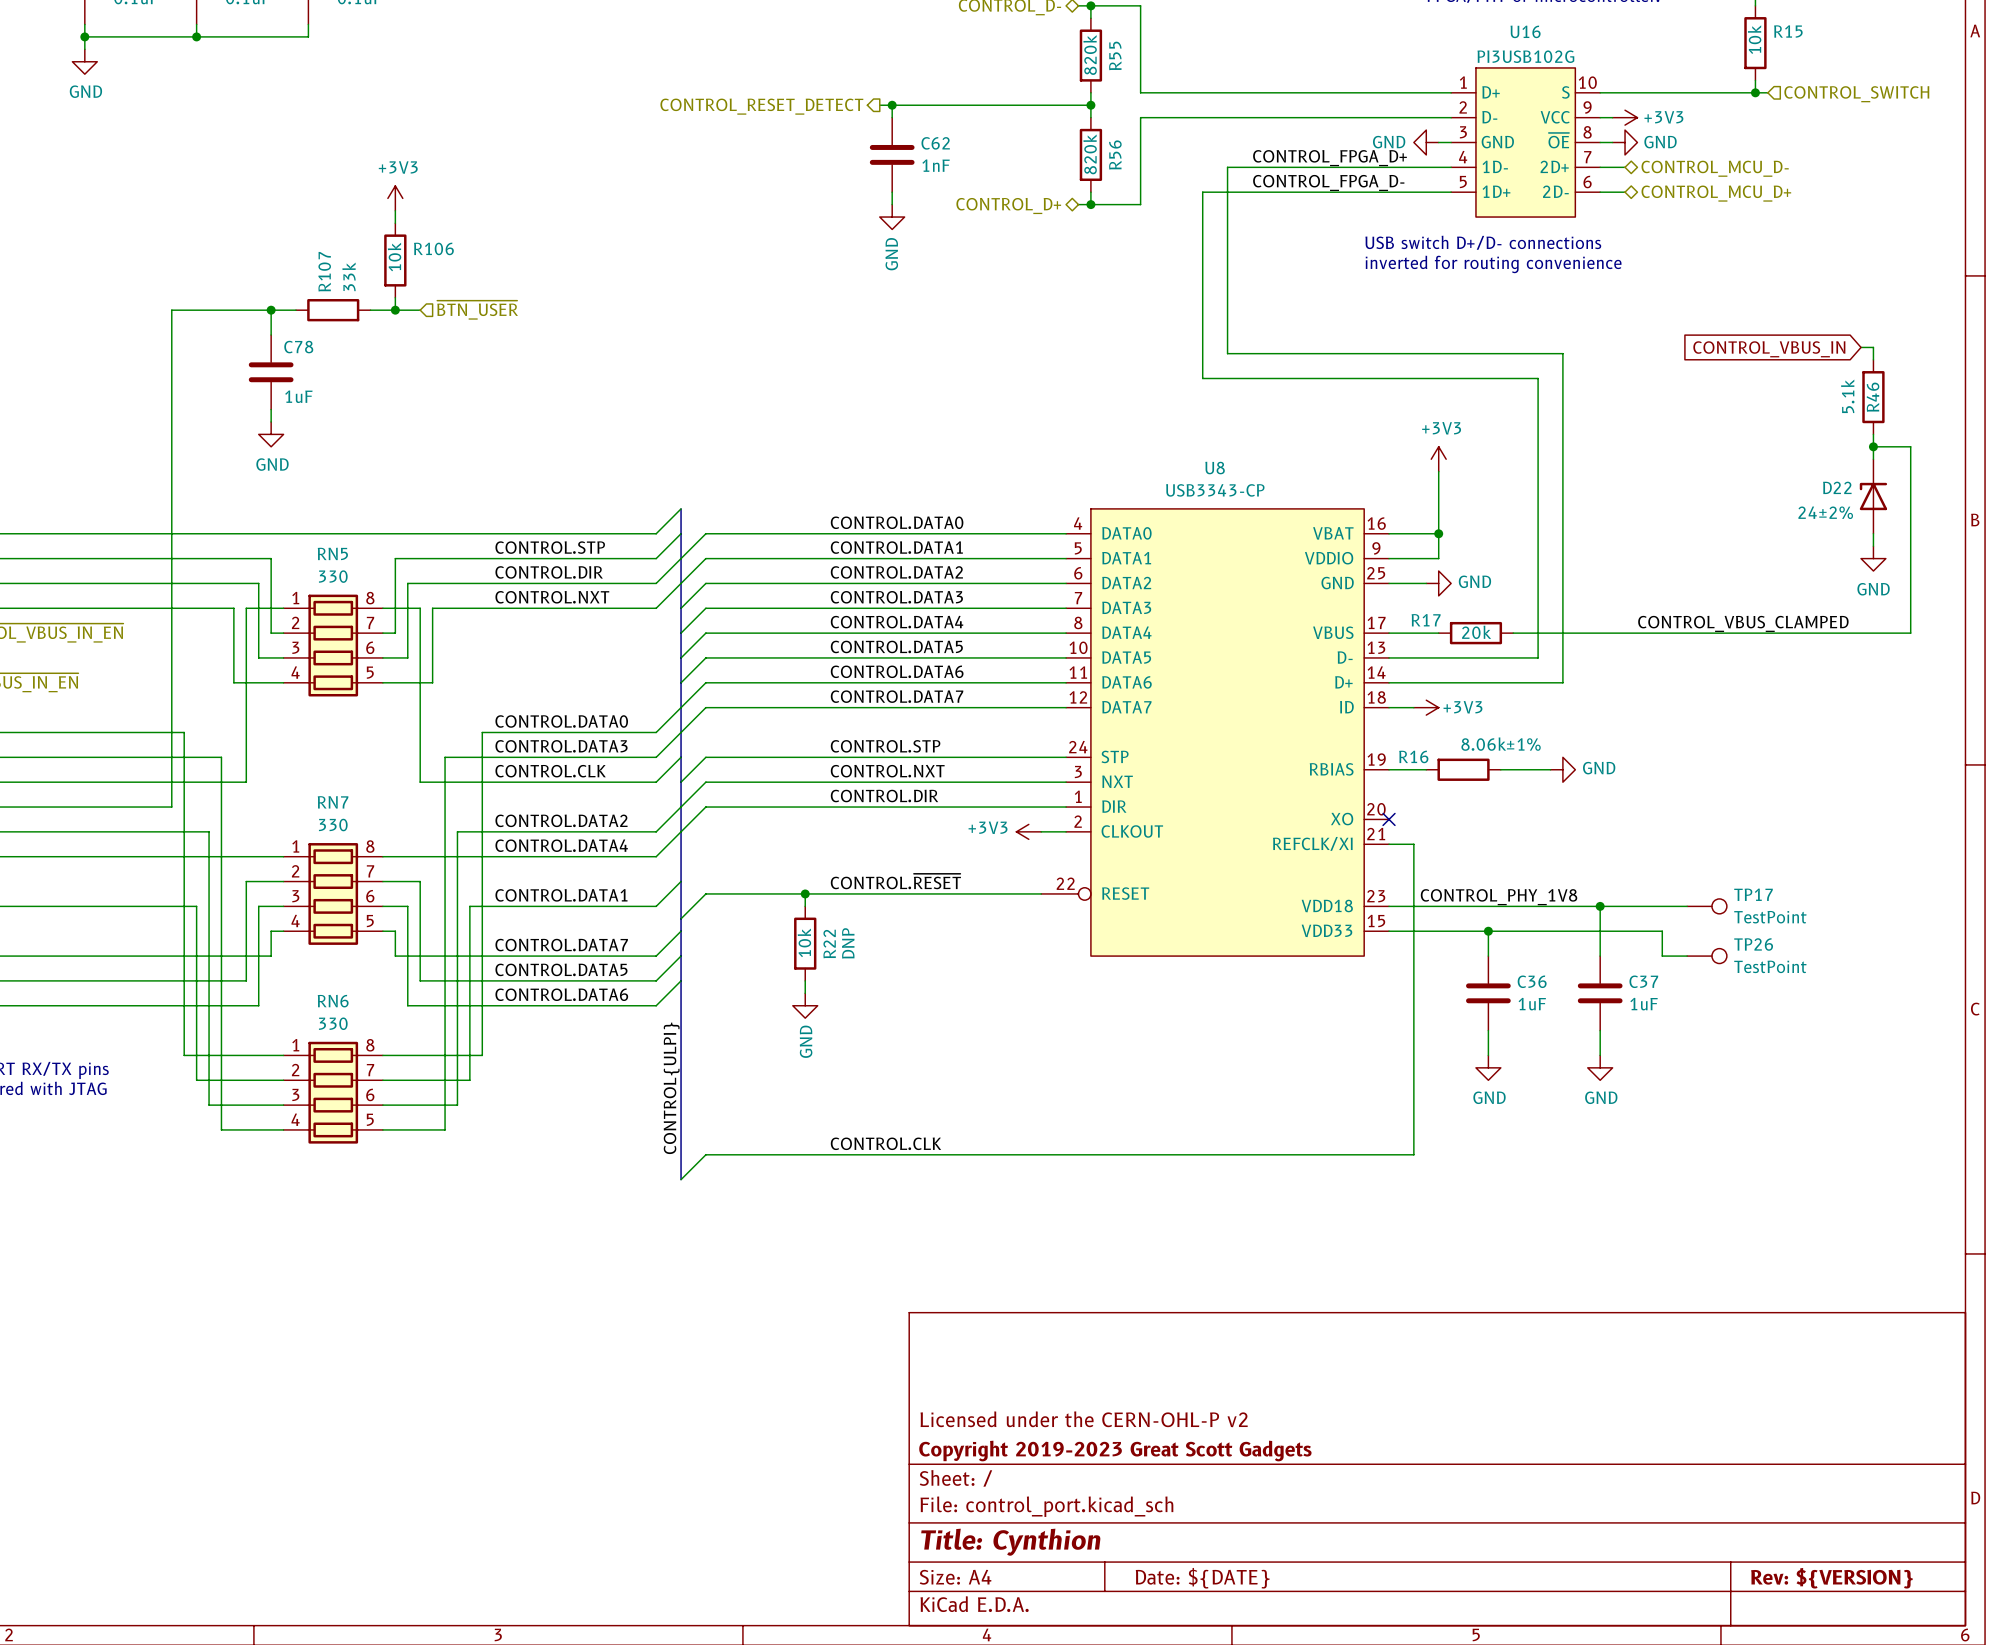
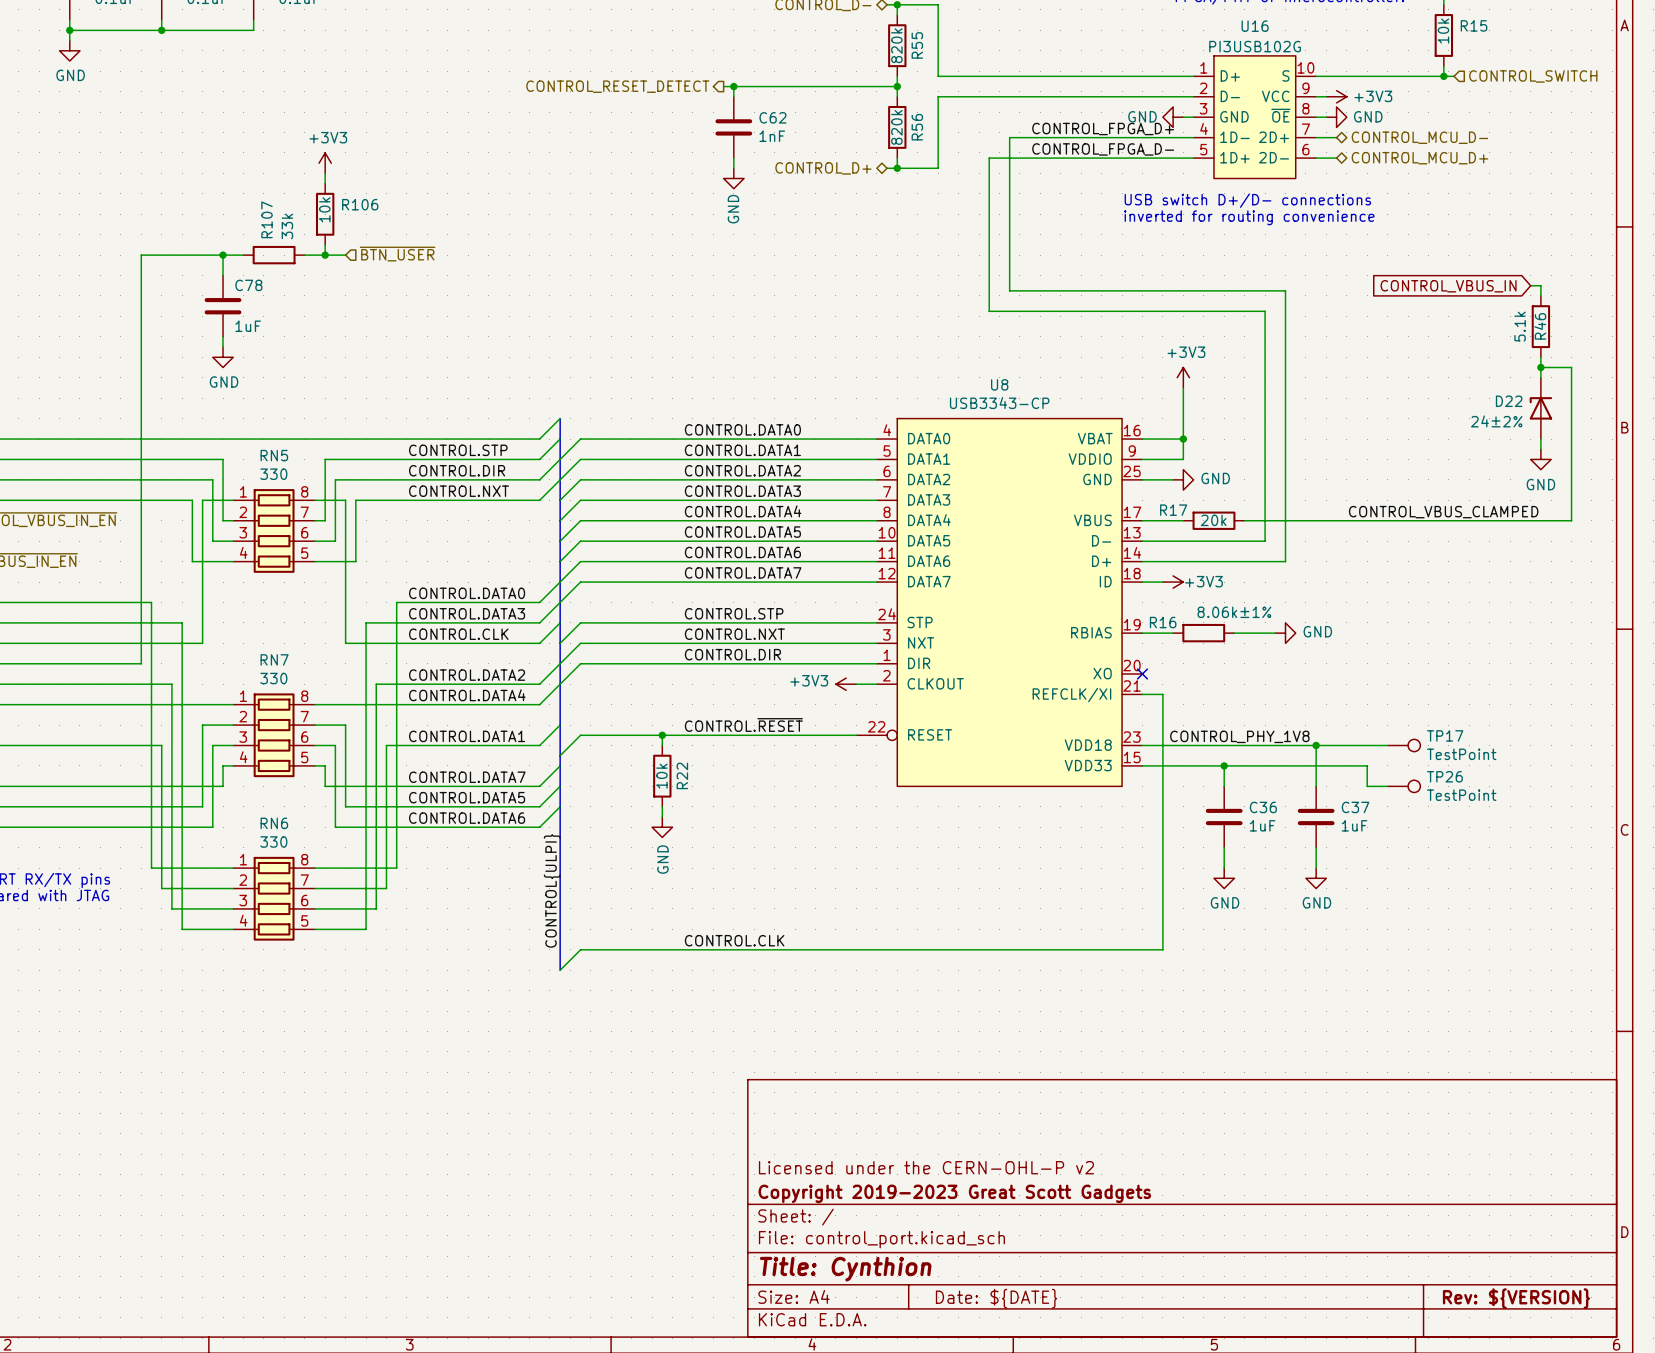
R22 text: DNP (848, 943) -> none

